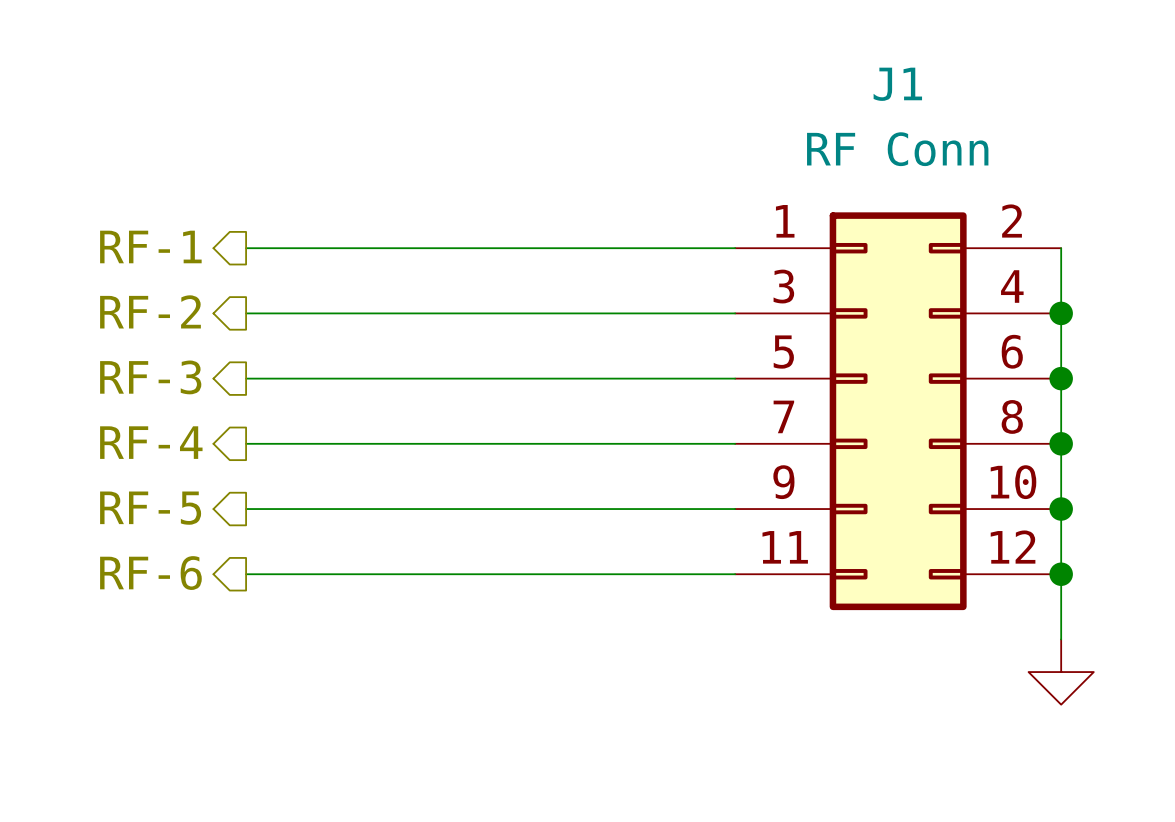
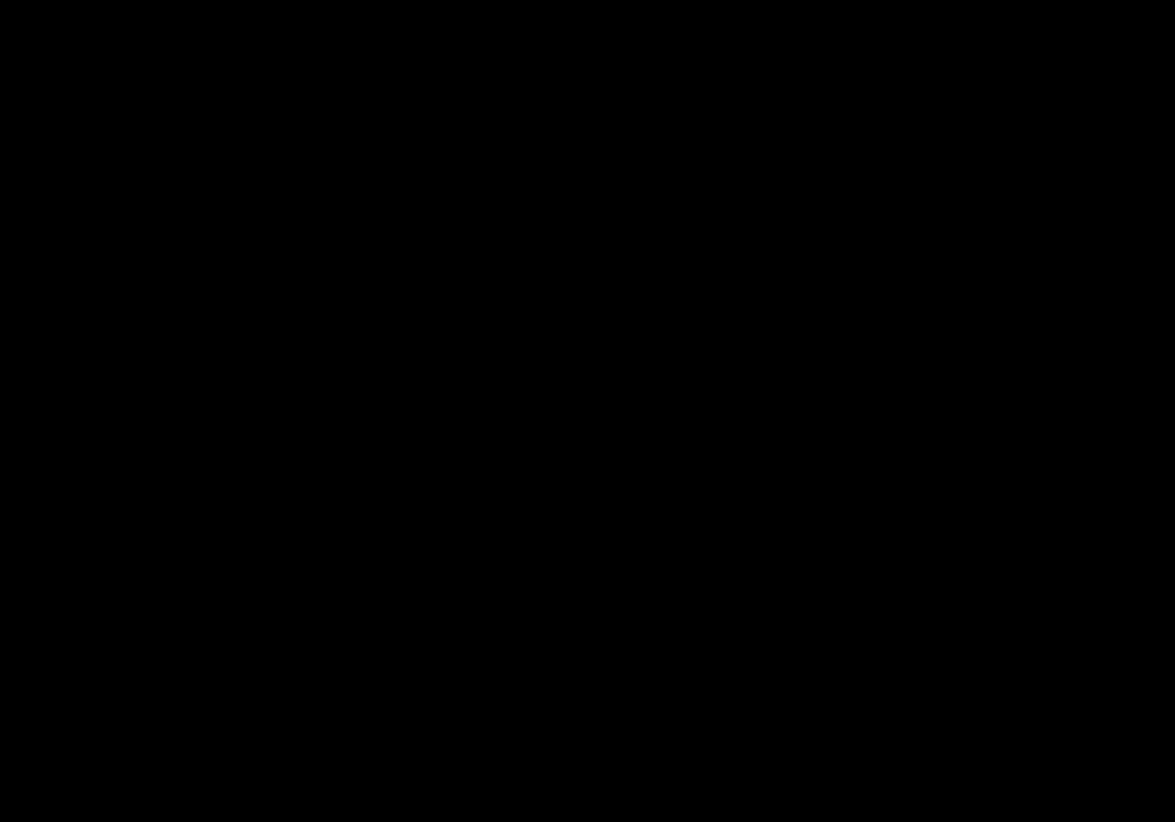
hierarchical label: RF-1 (150, 246) -> none
wire: (246, 248) (735, 248) -> none
wire: (1061, 248) (1061, 639) -> none
hierarchical label: RF-2 (150, 311) -> none
wire: (246, 313) (735, 313) -> none
junction: (1061, 313) -> none
hierarchical label: RF-3 (150, 377) -> none
wire: (246, 378) (735, 378) -> none
junction: (1061, 378) -> none
J1: RF Conn (898, 411) -> none
hierarchical label: RF-4 (151, 442) -> none
wire: (246, 443) (735, 443) -> none
junction: (1061, 443) -> none
hierarchical label: RF-5 (150, 508) -> none
wire: (246, 509) (735, 509) -> none
junction: (1061, 509) -> none
hierarchical label: RF-6 (150, 573) -> none
wire: (246, 574) (735, 574) -> none
junction: (1061, 574) -> none
power symbol: (1061, 672) -> none

